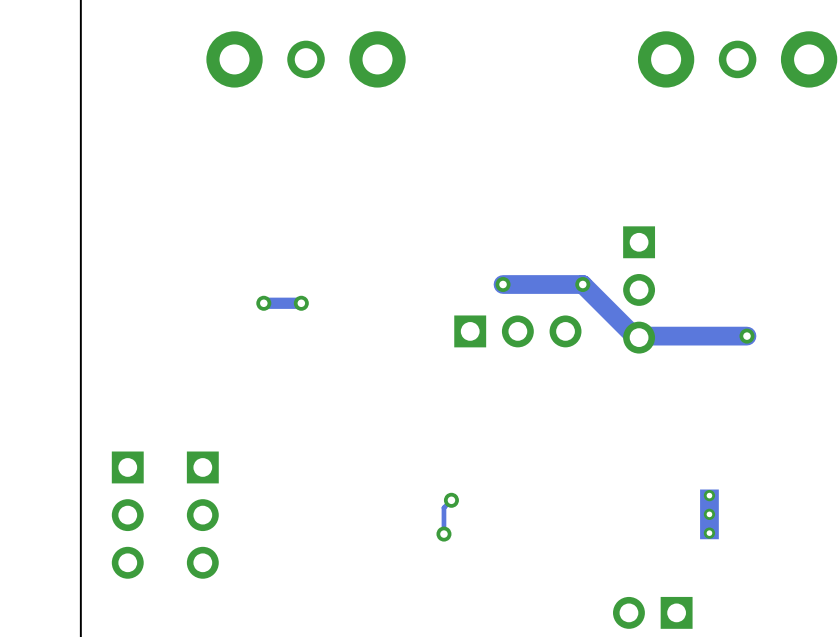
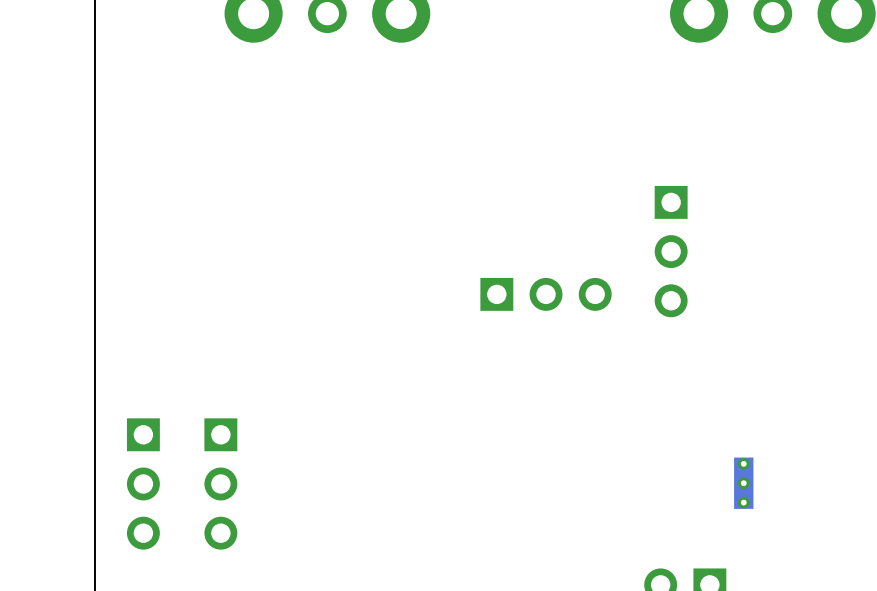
track: (503, 284) (582, 284) (635, 337) (746, 336) -> none
via: (503, 284) -> none
via: (582, 284) -> none
via: (263, 303) -> none
track: (301, 303) (263, 303) -> none
via: (301, 303) -> none
via: (746, 336) -> none
track: (451, 500) (443, 507) (443, 534) -> none
via: (451, 500) -> none
via: (443, 534) -> none

